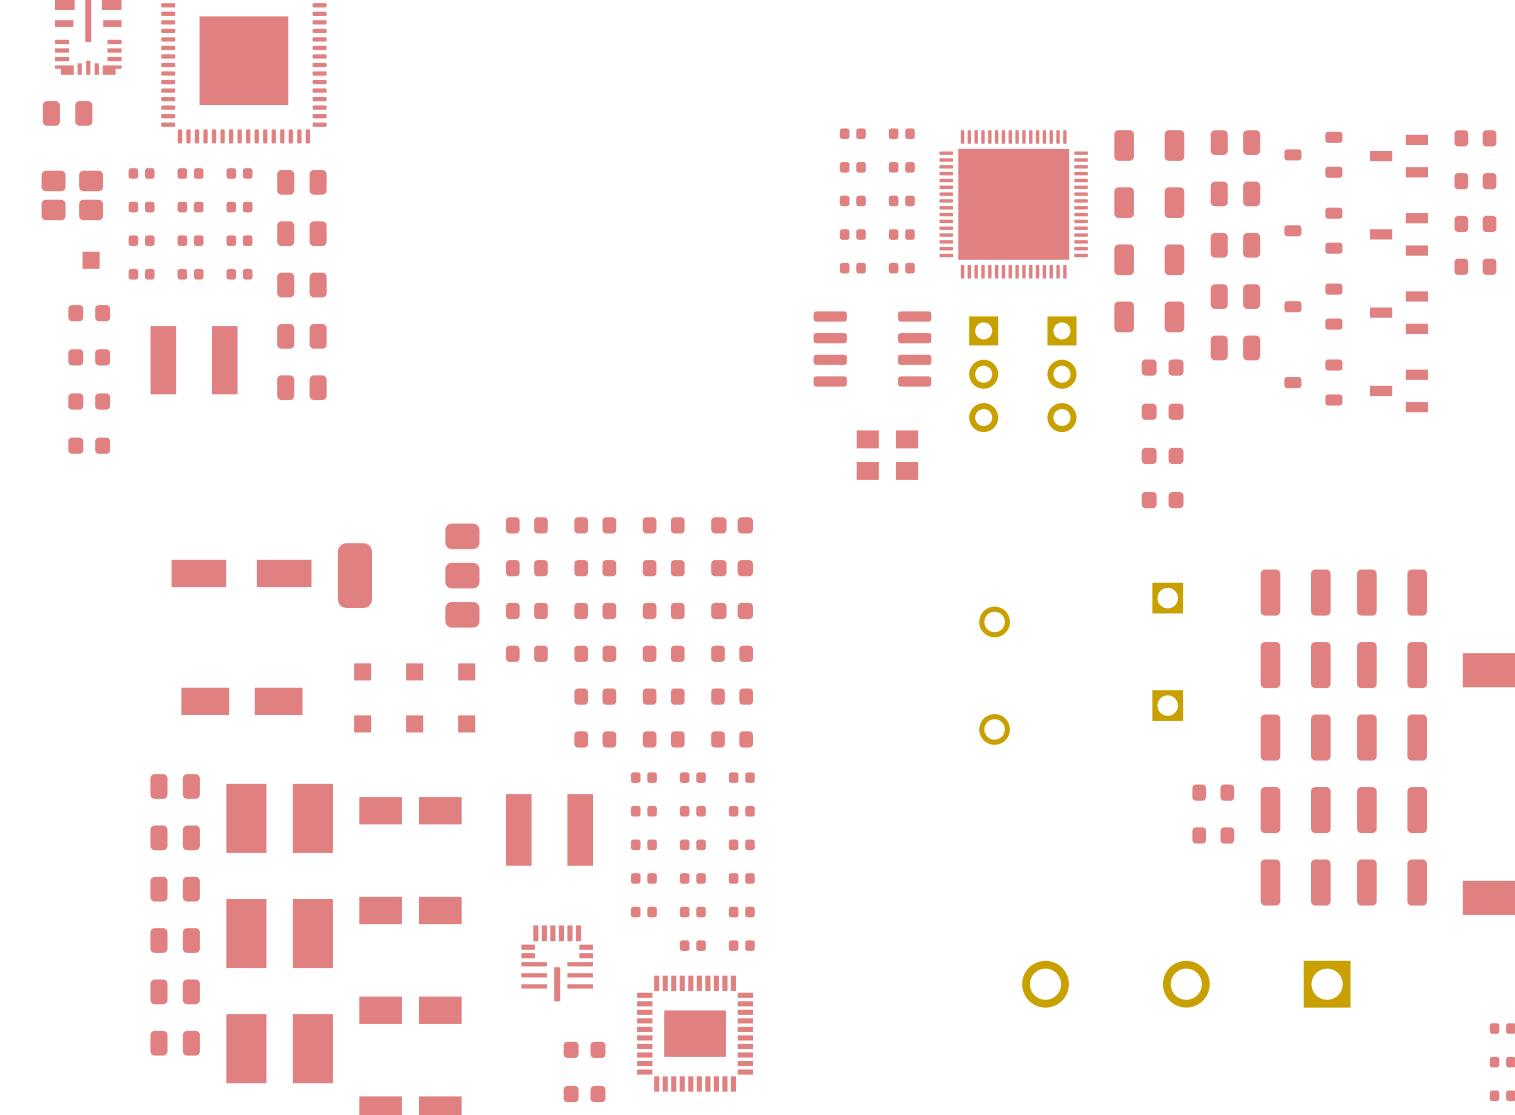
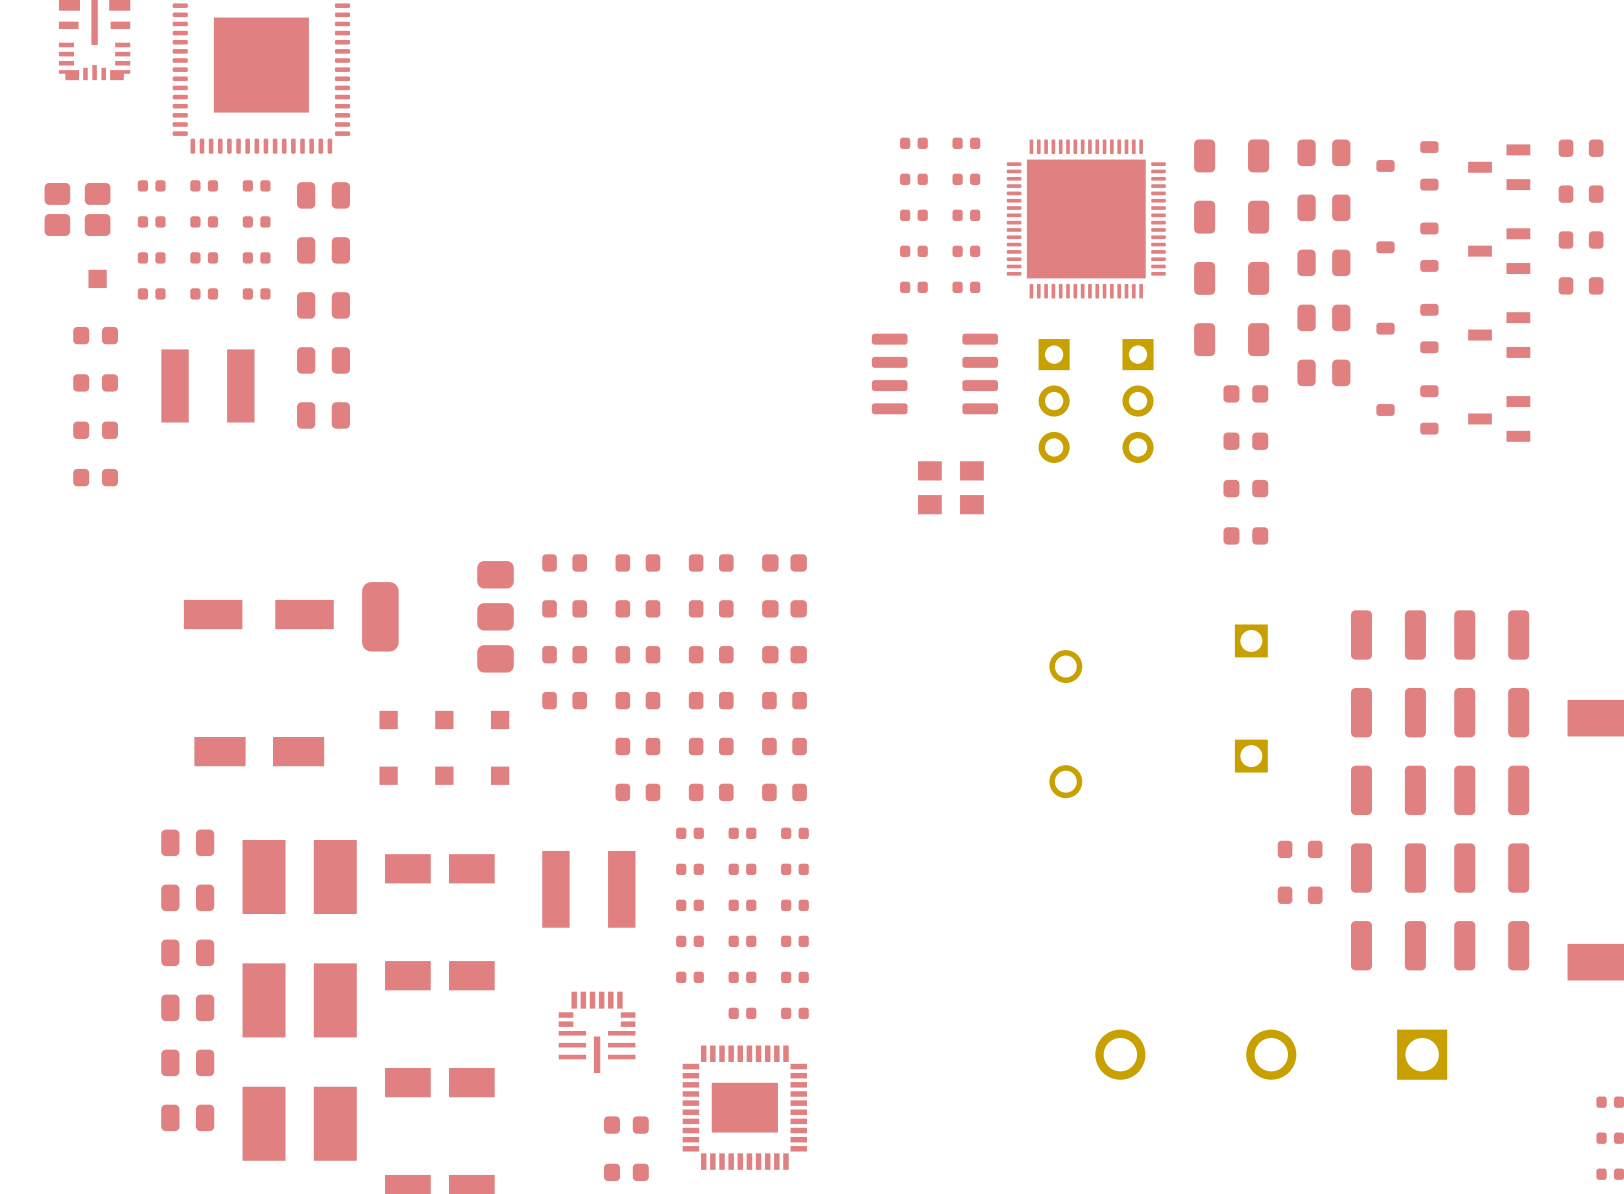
part: (67, 113) -> none

